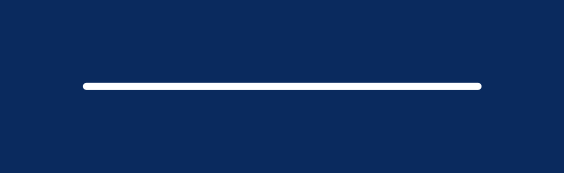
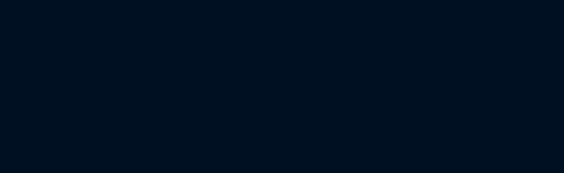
line: (478, 86) (86, 86) -> none

